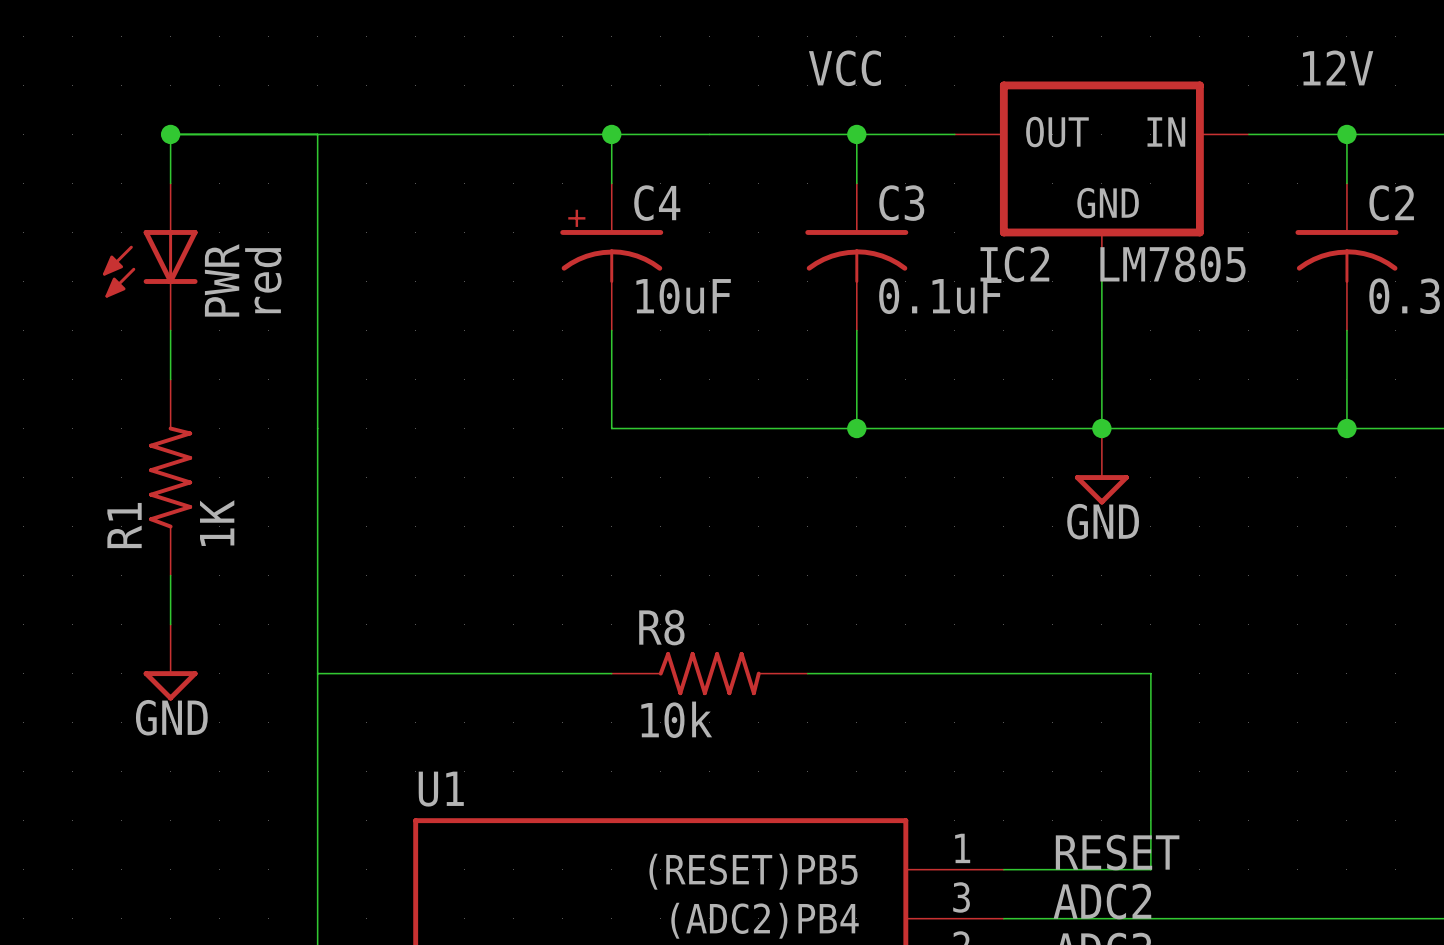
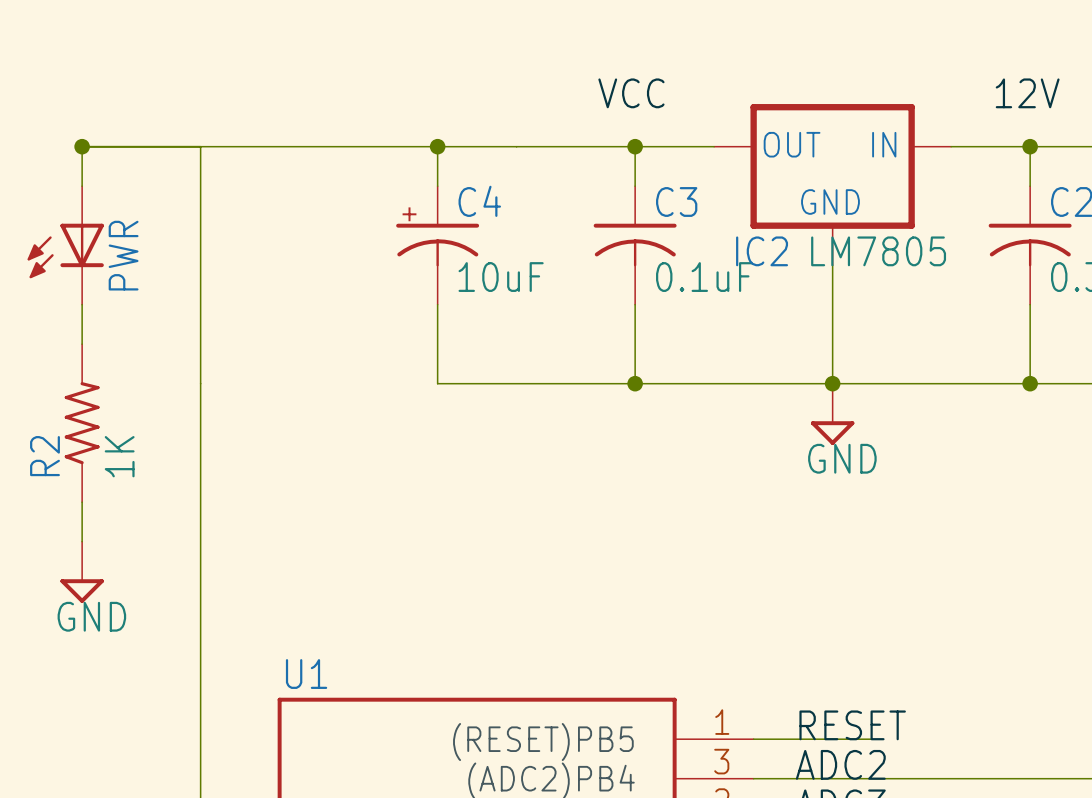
PWR value: red (263, 280) -> none
R1 name: R1 (124, 525) -> R2 (44, 456)
wire: (317, 673) (611, 673) -> none
R8: 10k (709, 673) -> none
wire: (807, 673) (1150, 673) (1150, 869) -> none

